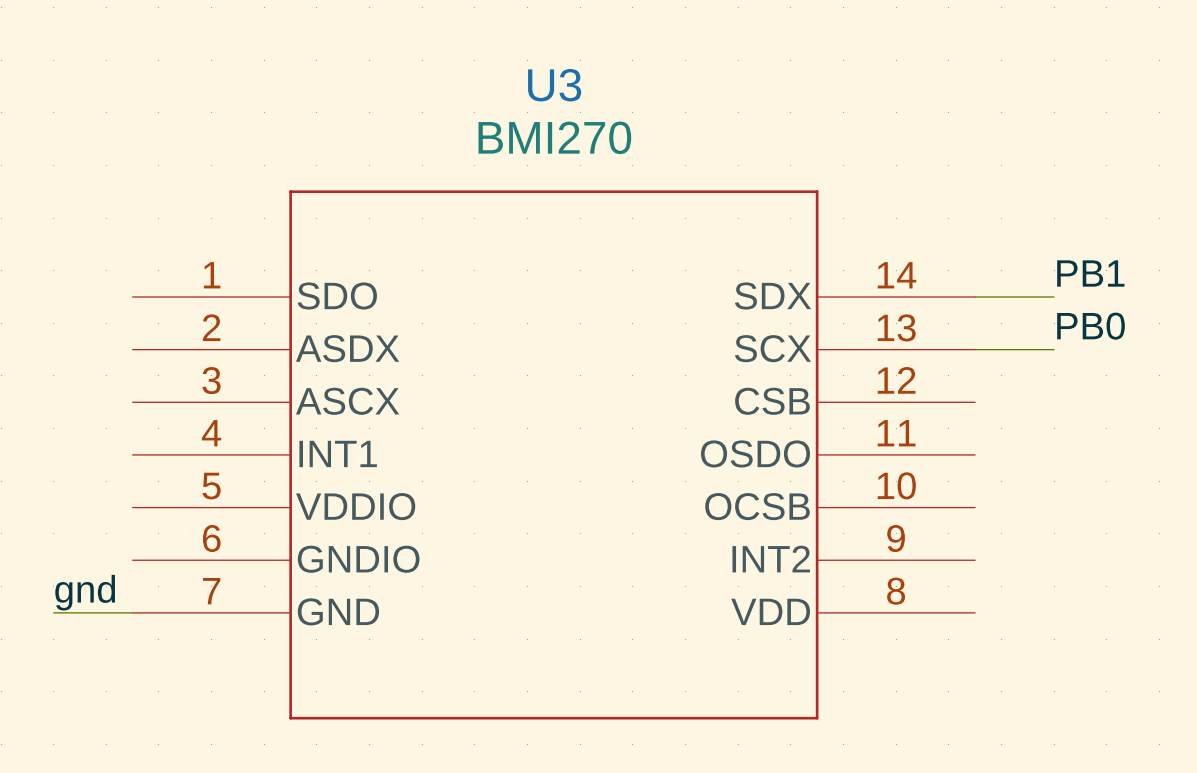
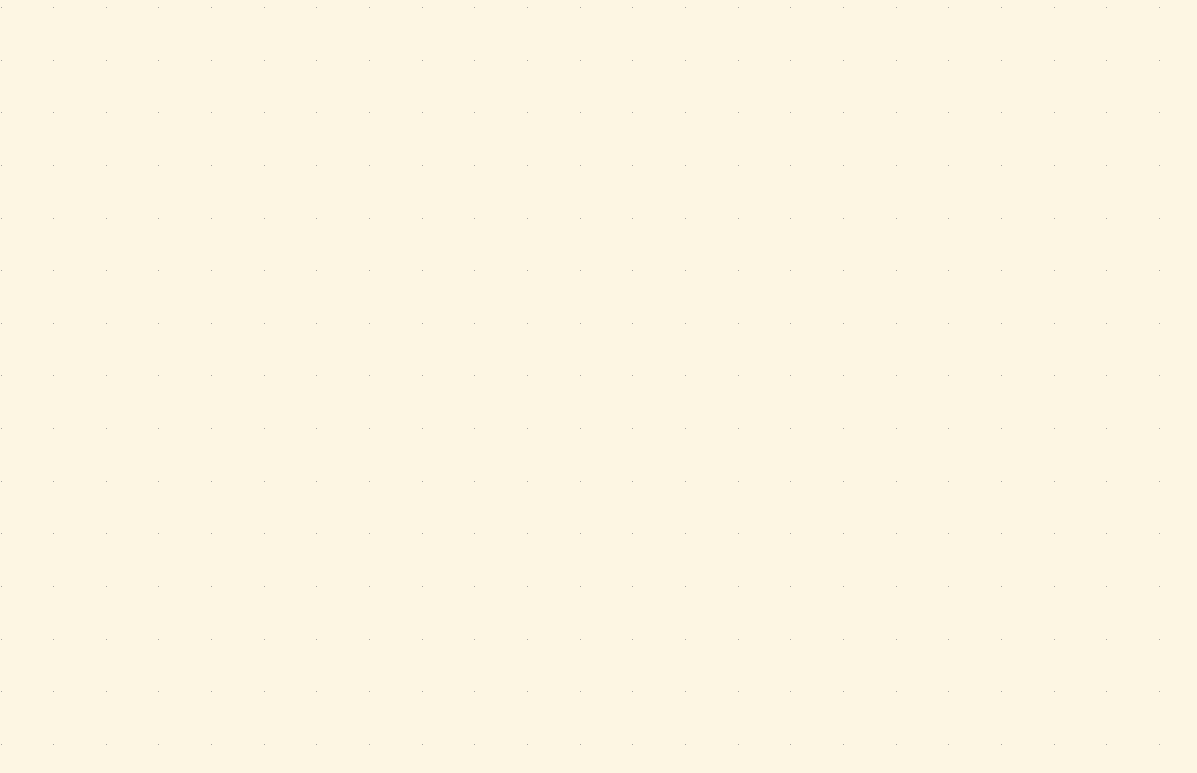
label: PB1 (1090, 273) -> none
wire: (975, 296) (1054, 296) -> none
label: PB0 (1091, 326) -> none
wire: (975, 349) (1054, 349) -> none
U3: BMI270 (553, 454) -> none
label: gnd (85, 592) -> none
wire: (53, 612) (132, 612) -> none

